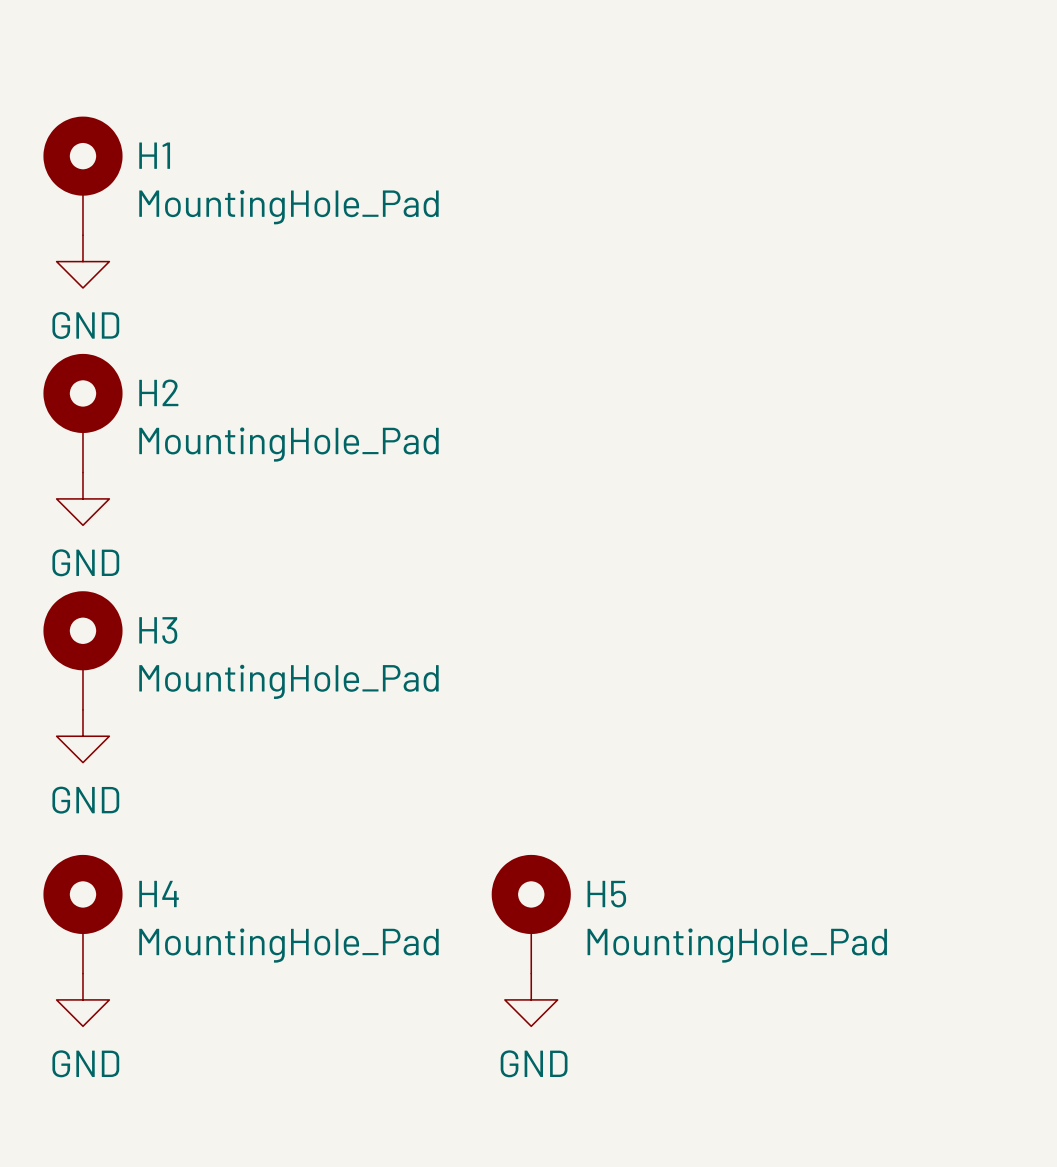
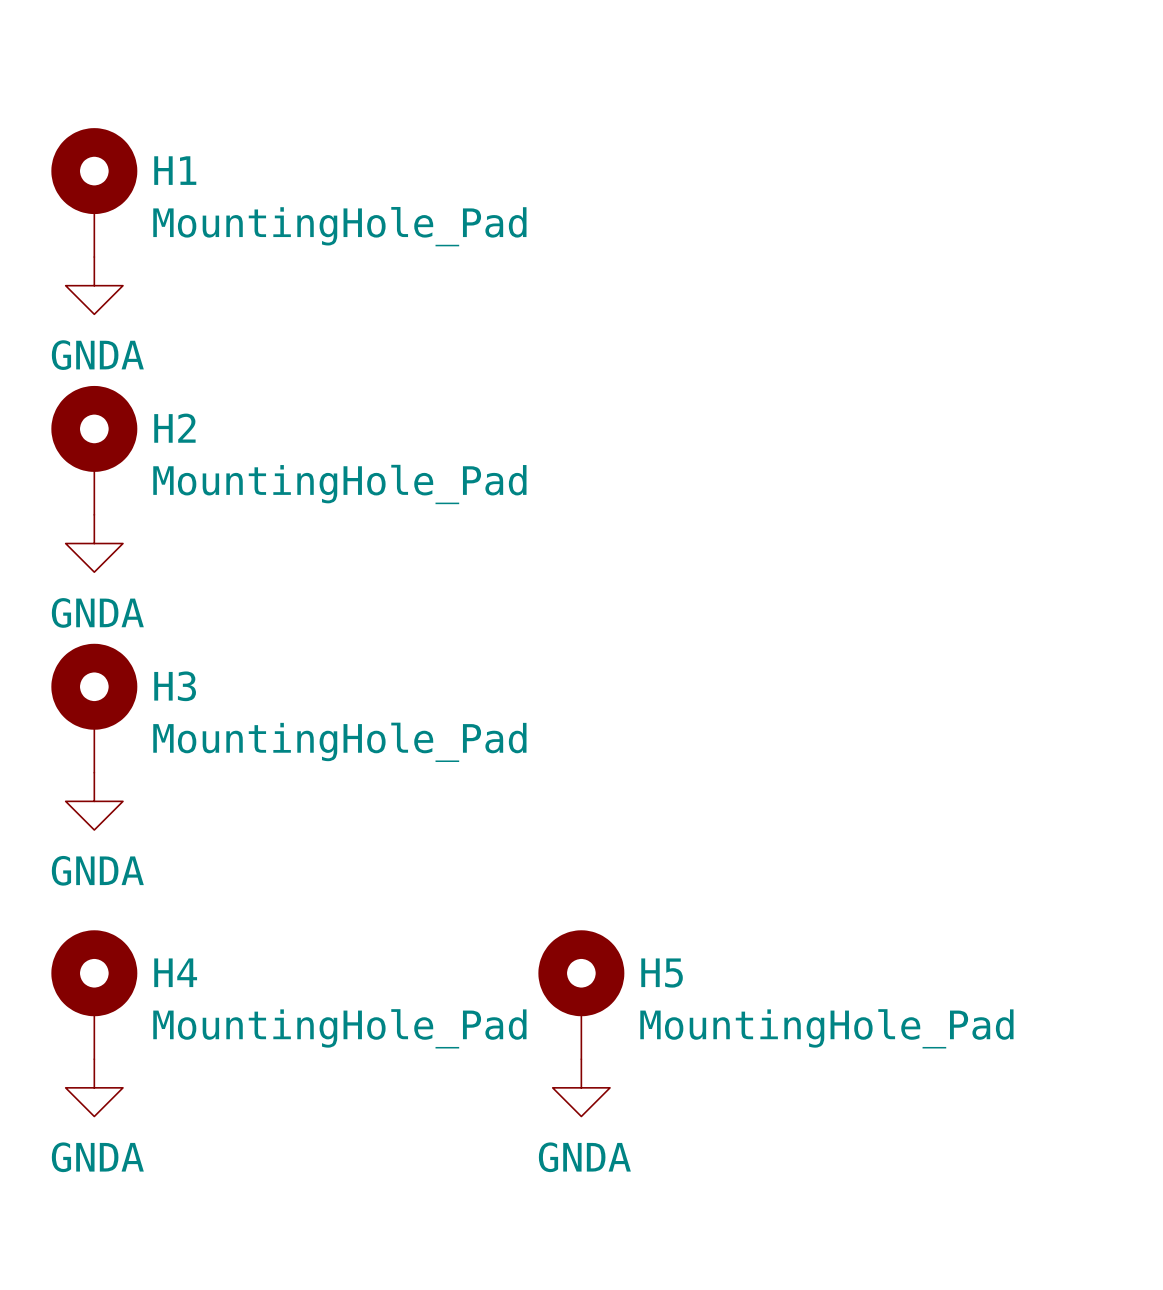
power symbol: GND (82, 261) -> GNDA (94, 285)
power symbol: GND (82, 498) -> GNDA (94, 543)
power symbol: GND (82, 736) -> GNDA (94, 801)
power symbol: GND (82, 999) -> GNDA (94, 1087)
power symbol: GND (531, 999) -> GNDA (581, 1087)

